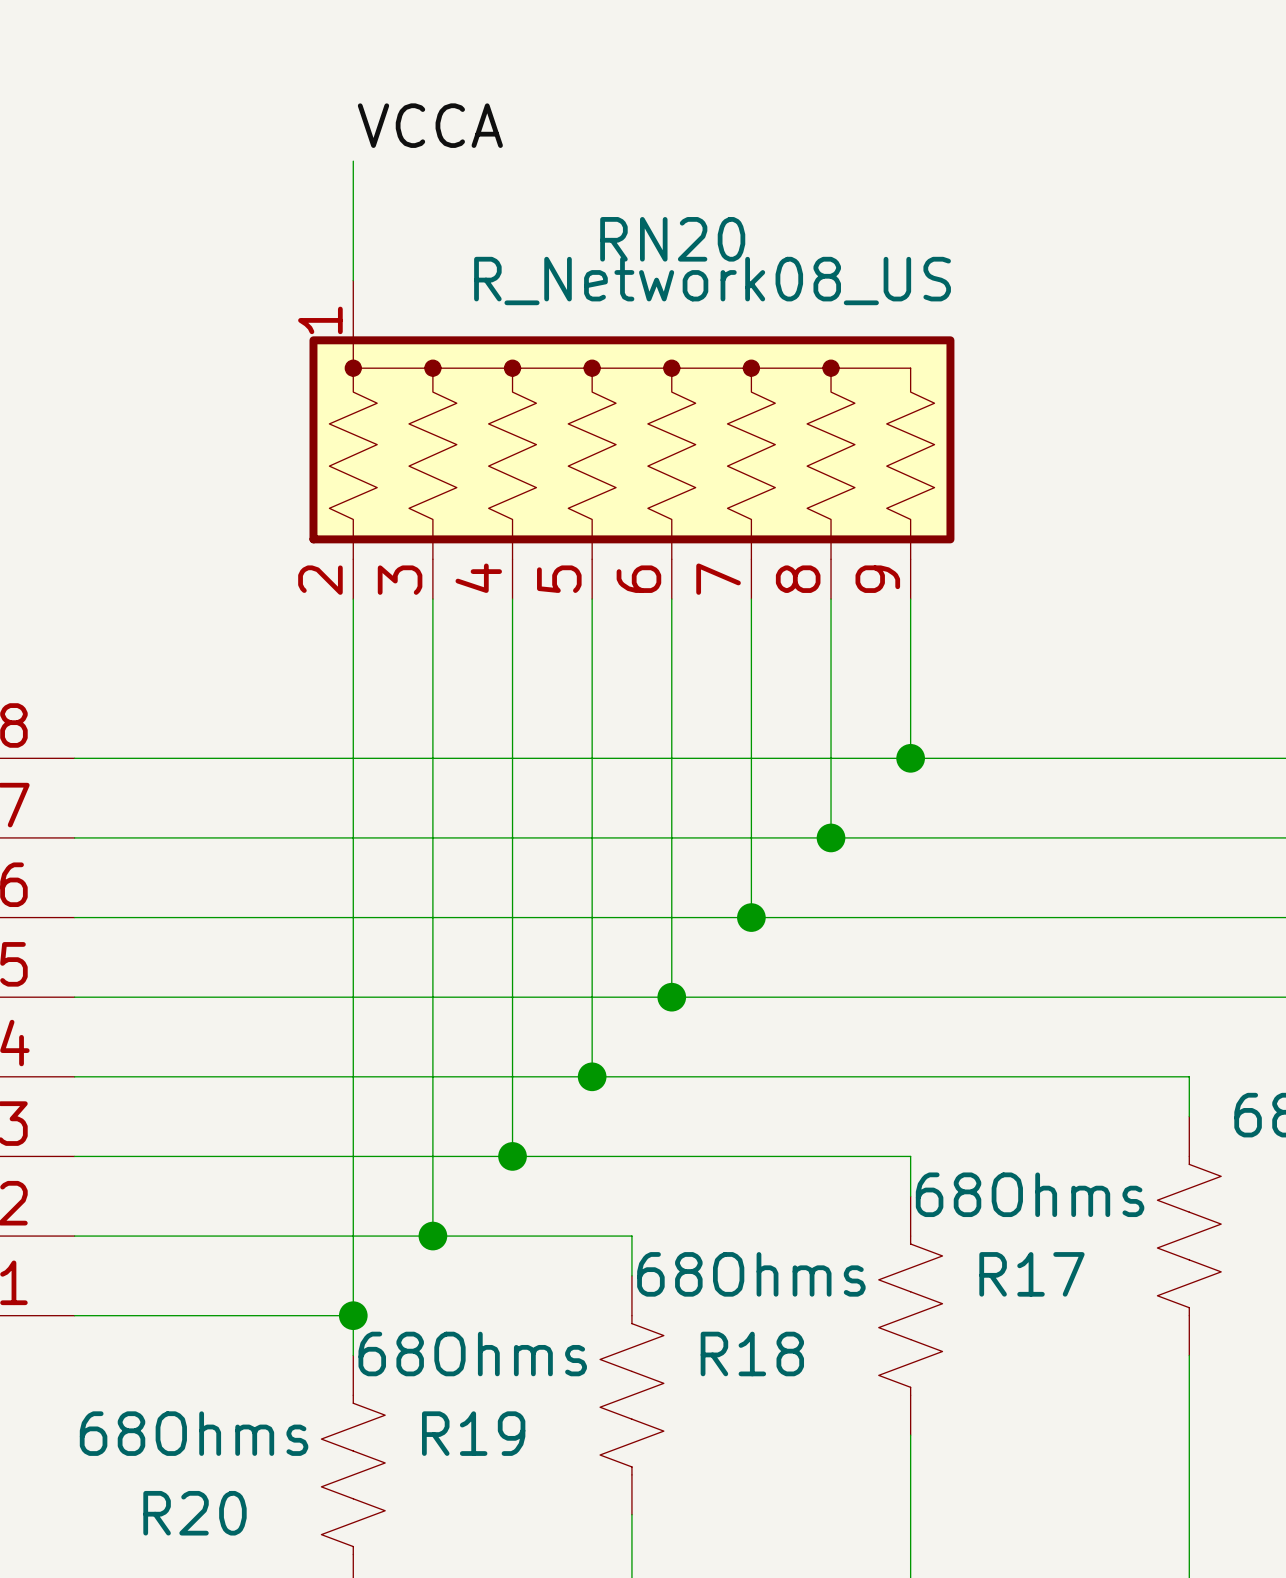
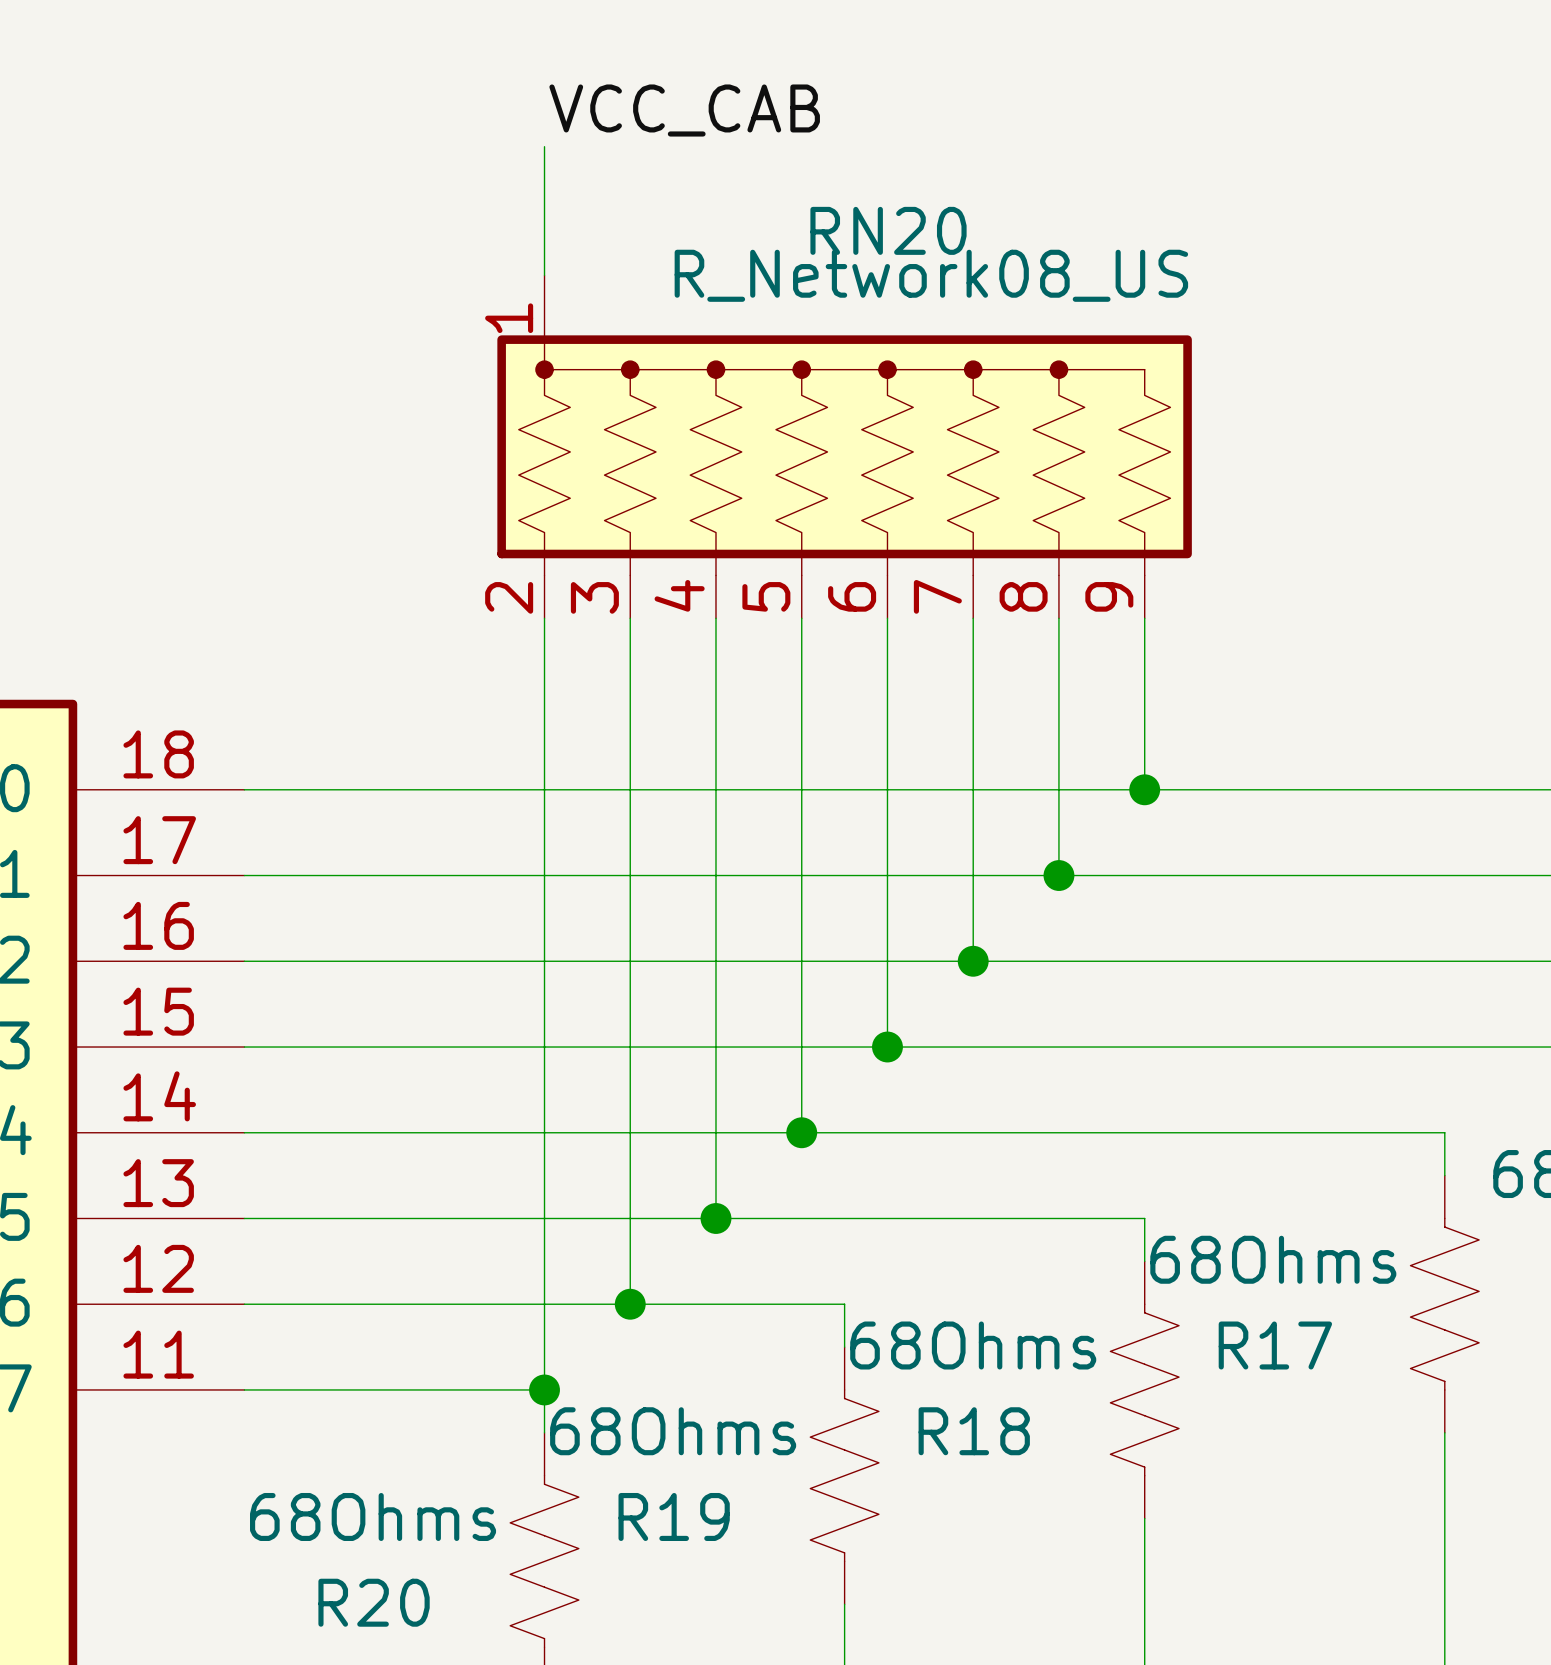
label: VCCA (430, 125) -> VCC_CAB (684, 110)

